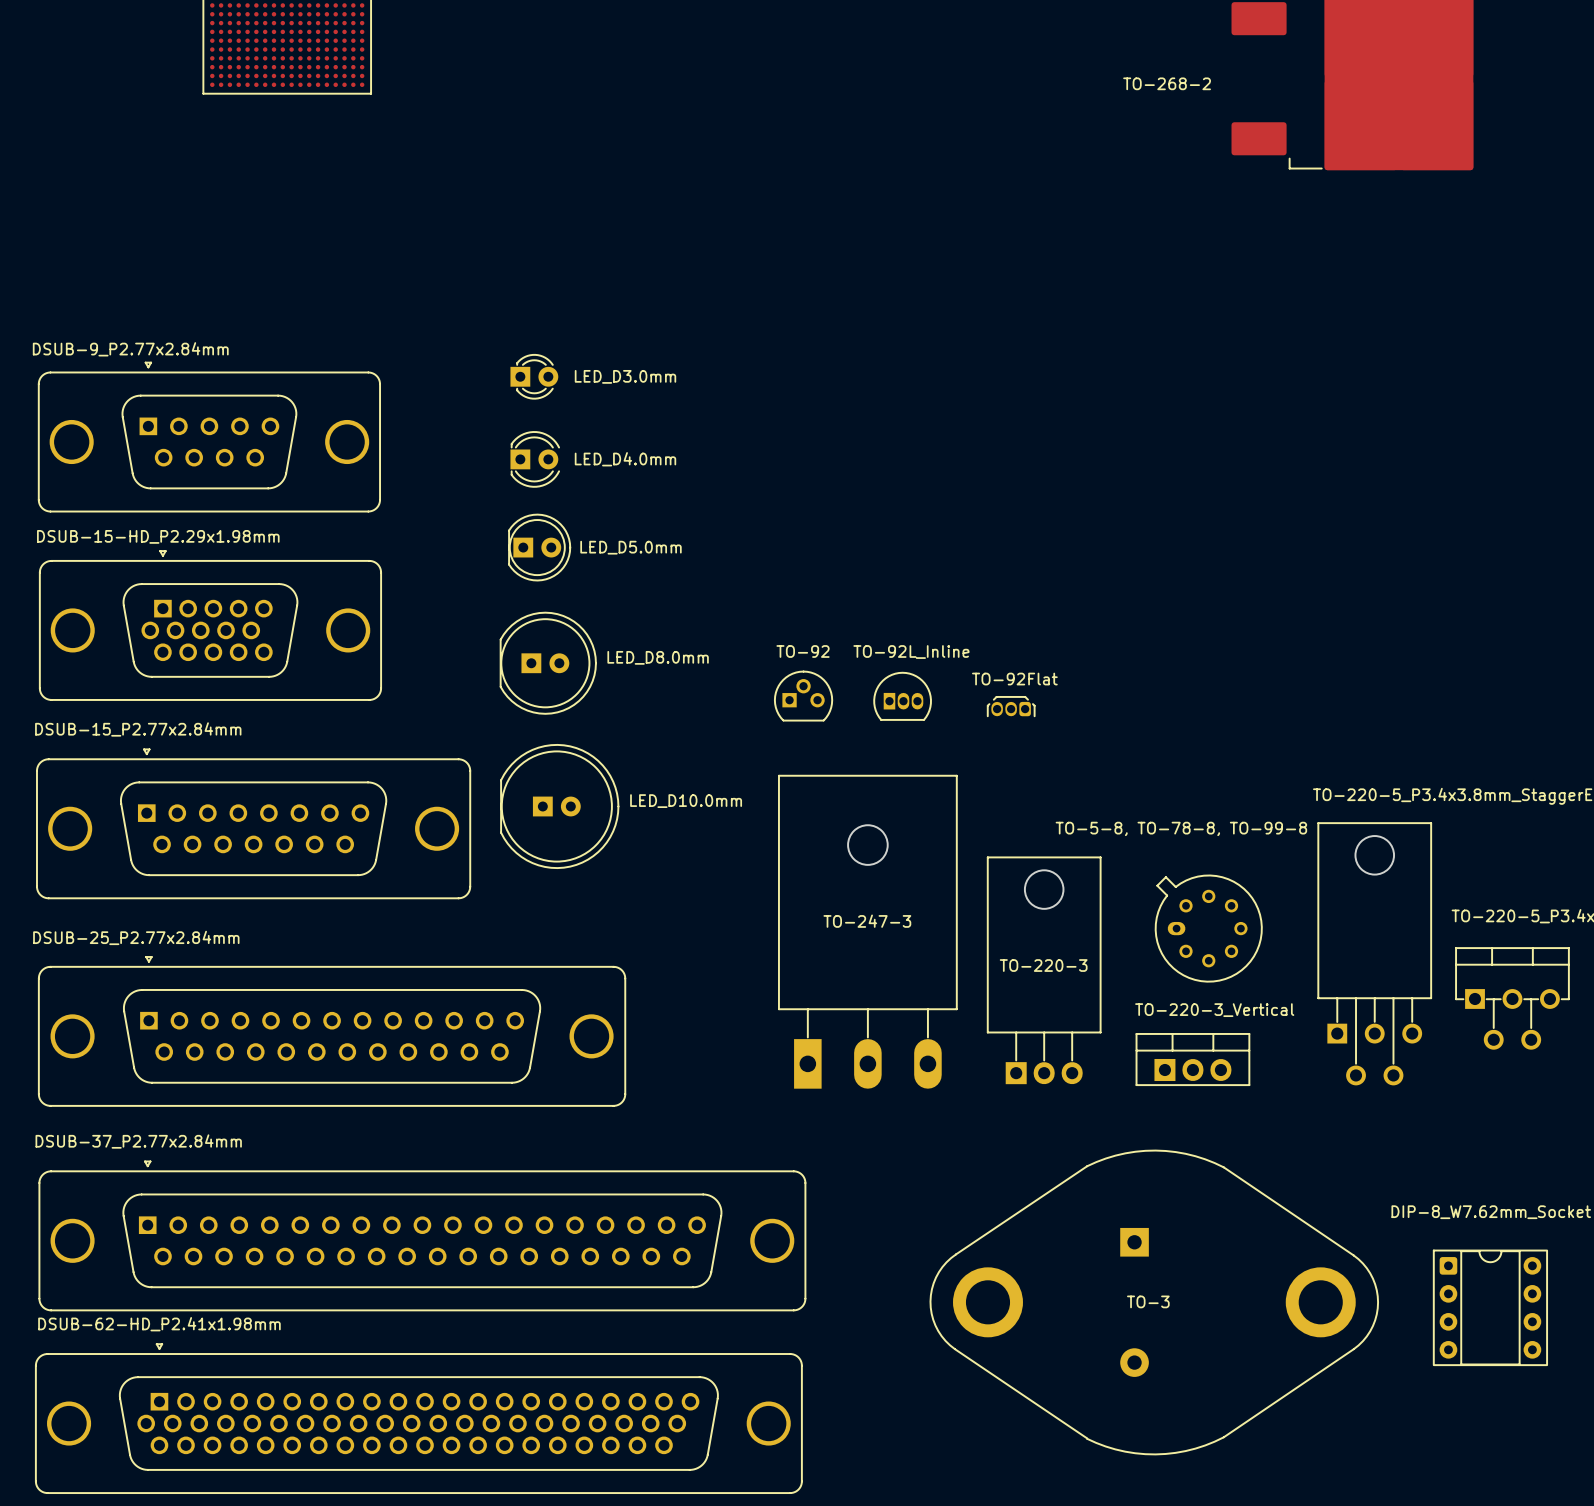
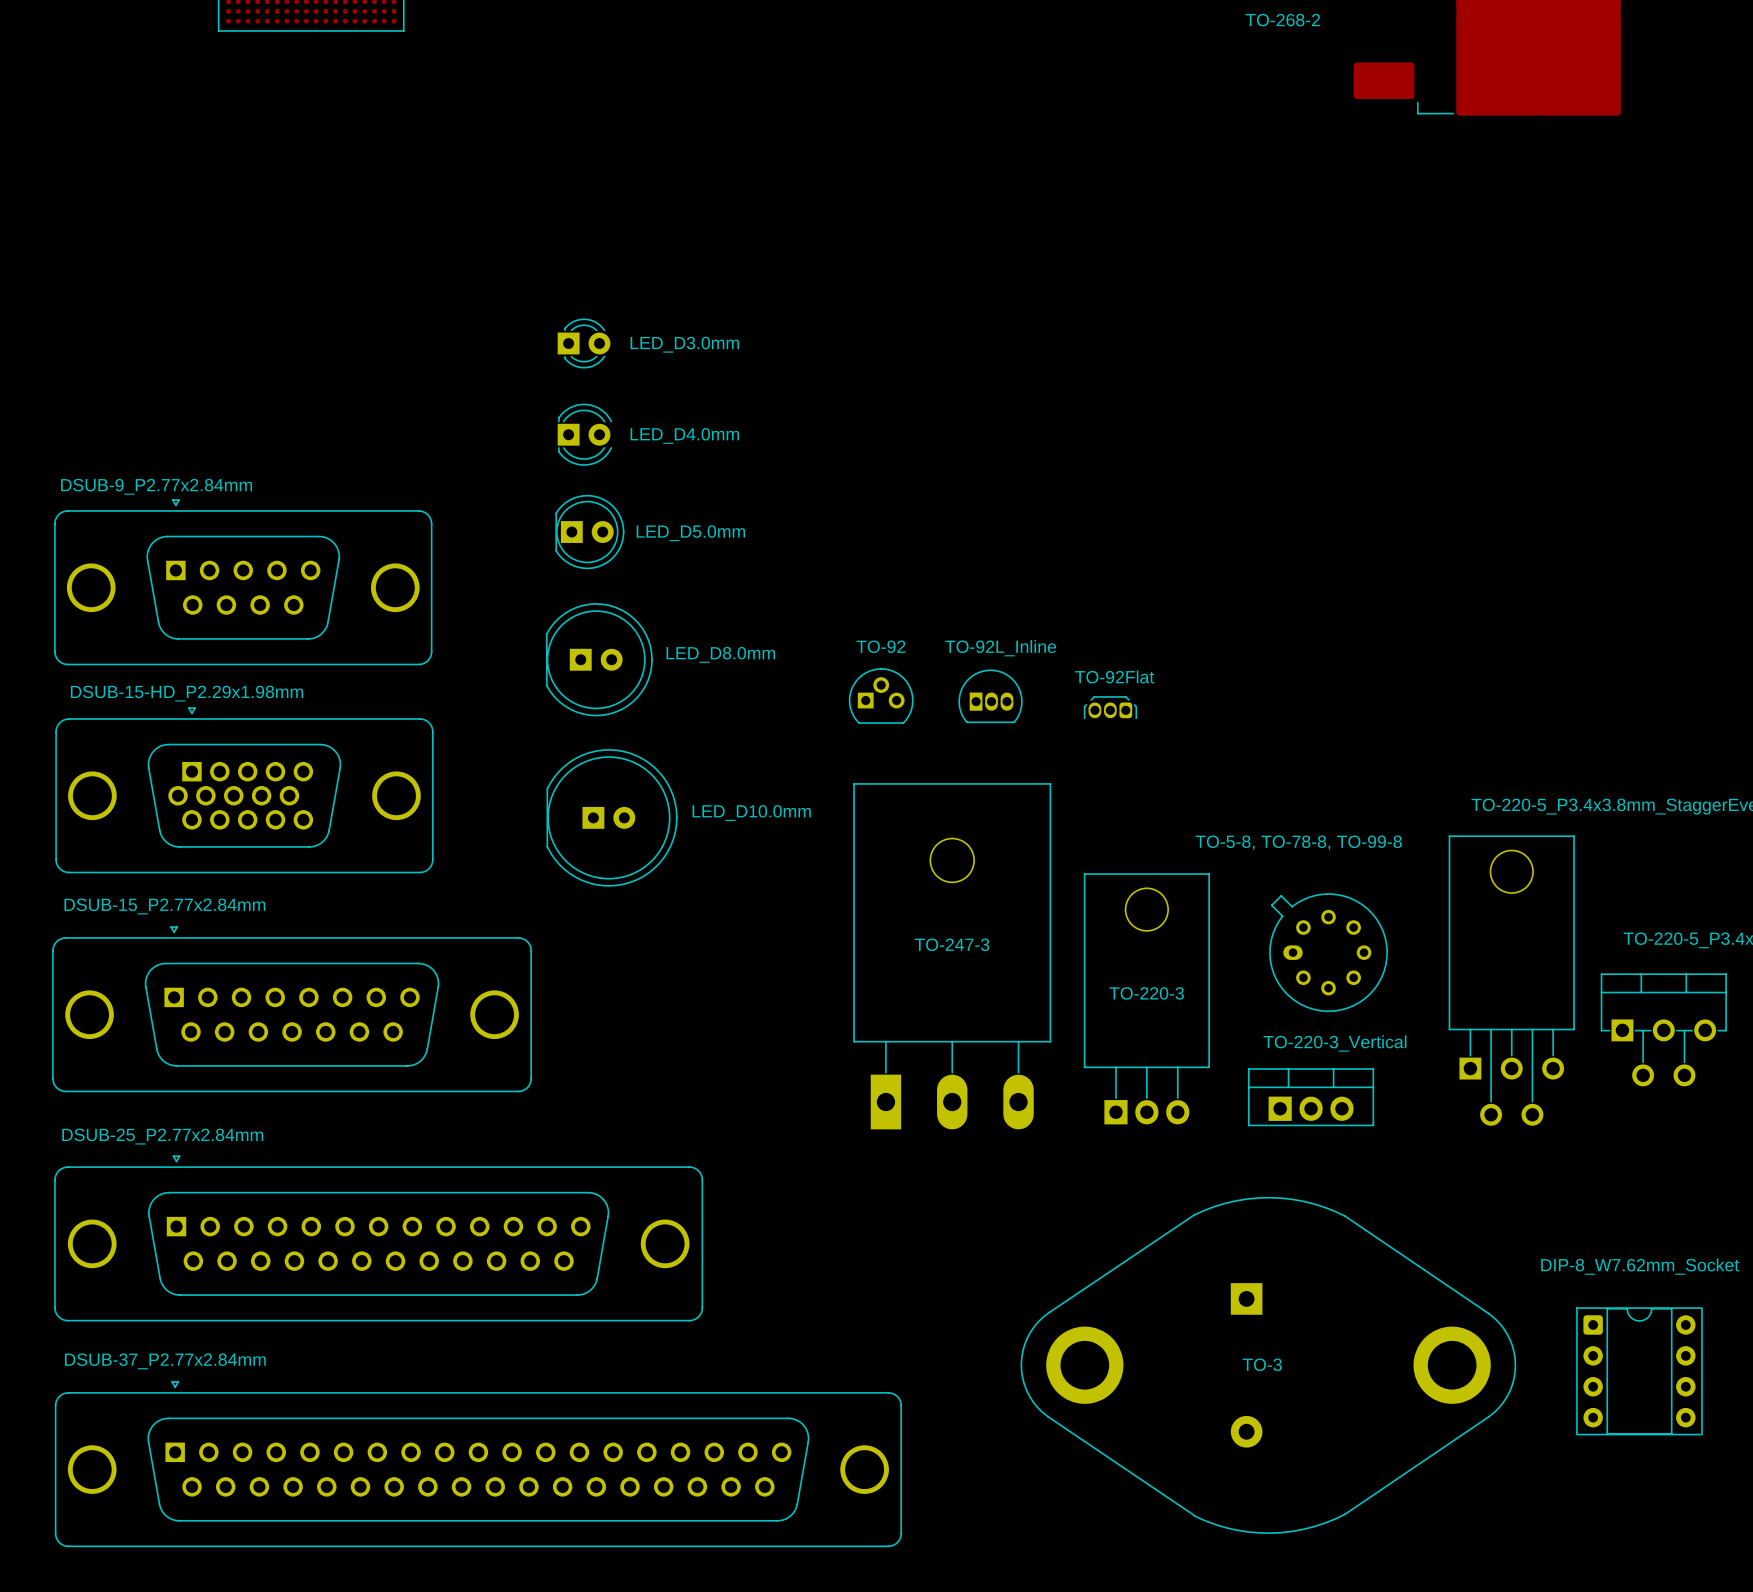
DSUB-9_P2.77x2.84mm position: (209, 437) -> (243, 582)
DSUB-15-HD_P2.29x1.98mm position: (210, 625) -> (244, 790)
DSUB-15_P2.77x2.84mm position: (253, 823) -> (292, 1009)
DSUB-25_P2.77x2.84mm position: (332, 1031) -> (378, 1238)
DSUB-37_P2.77x2.84mm position: (422, 1235) -> (478, 1464)
DSUB-62-HD_P2.41x1.98mm: (418, 1418) -> none

